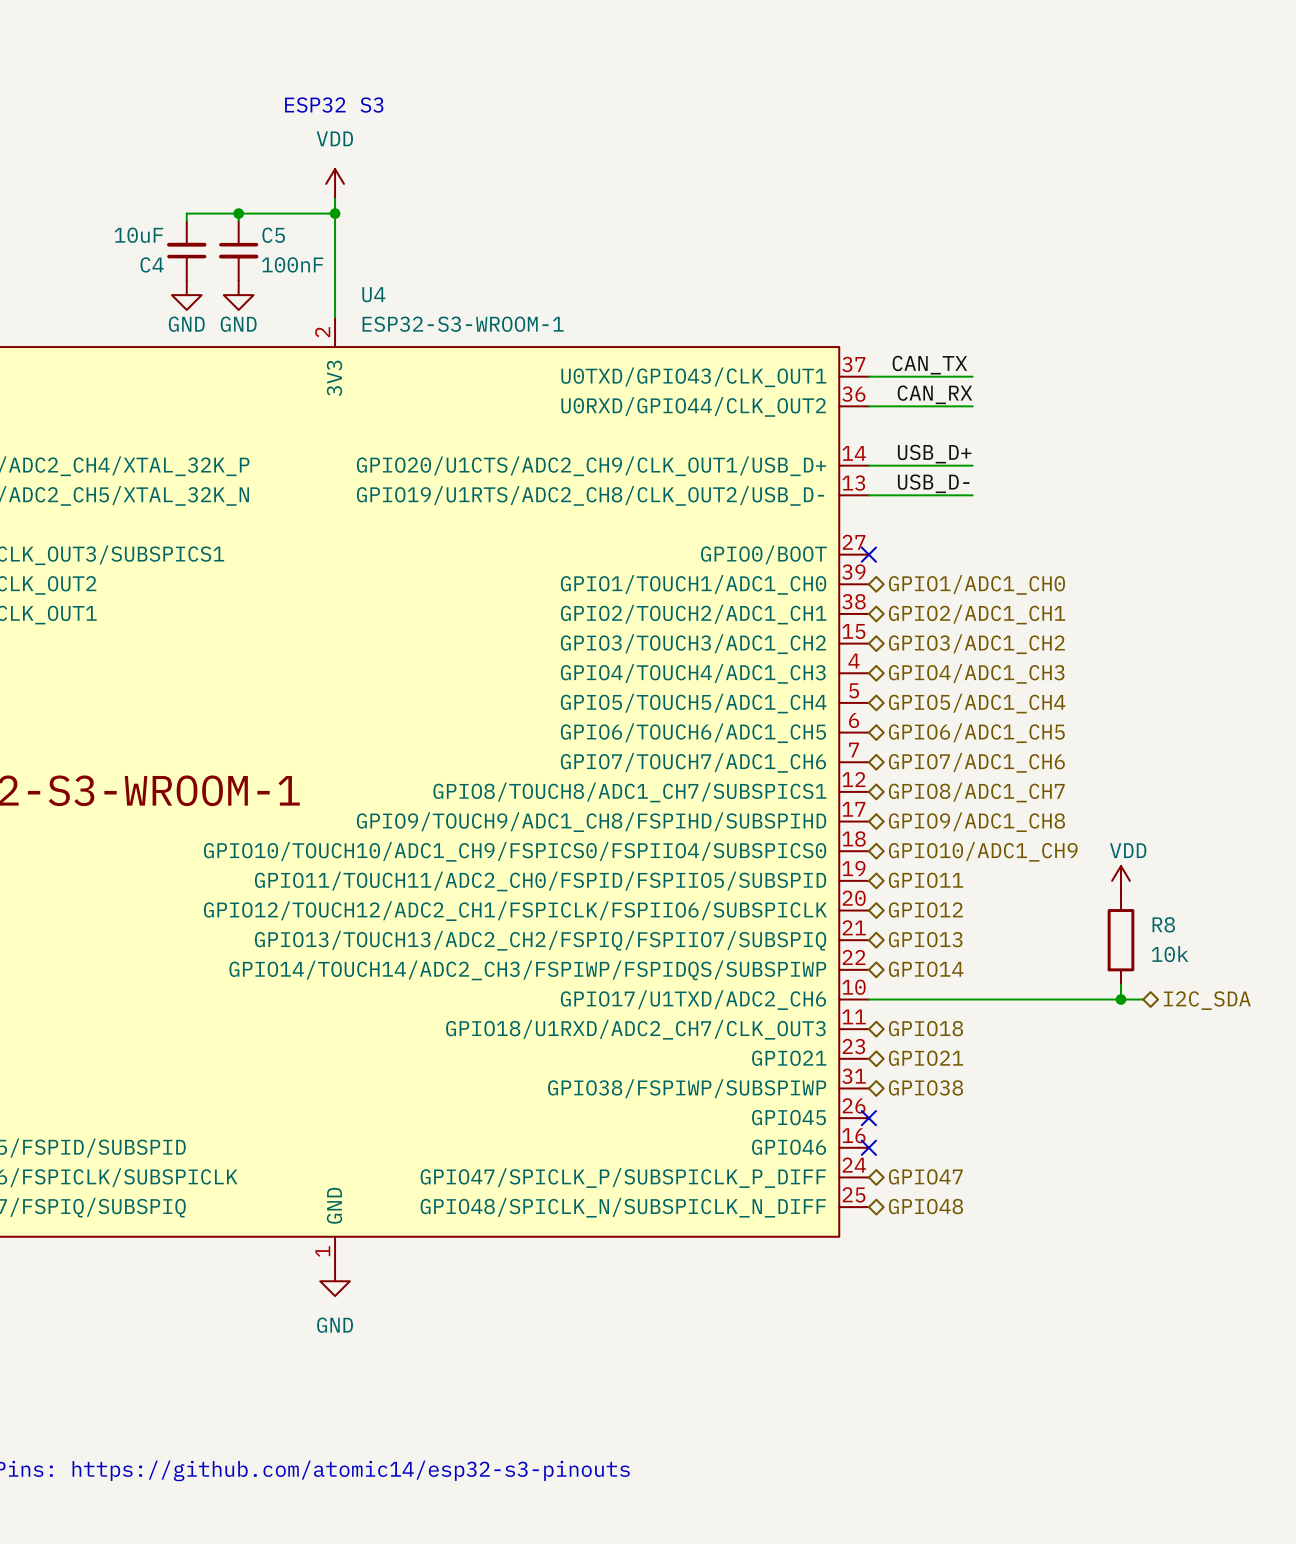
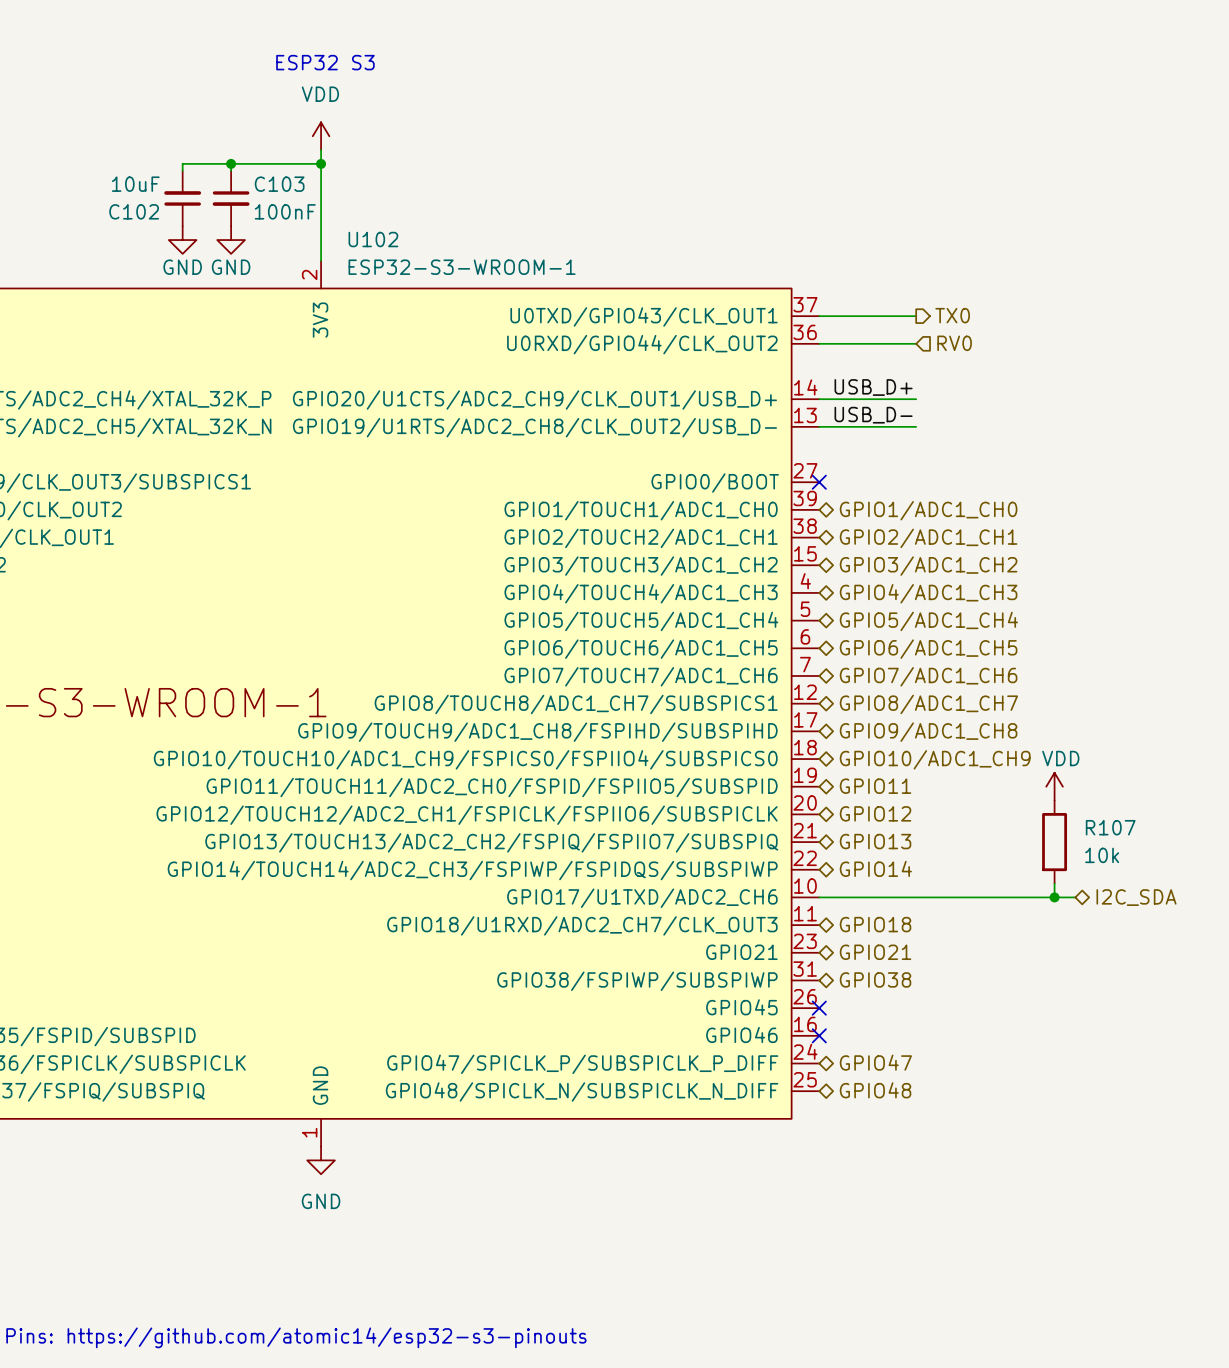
C5 name: C5 (273, 235) -> C103 (279, 184)
C4 name: C4 (152, 264) -> C102 (134, 211)
U4 name: U4 (373, 294) -> U102 (373, 239)
label: CAN_TX (929, 365) -> none
hierarchical label: none -> TX0 (952, 315)
label: CAN_RX (934, 394) -> none
hierarchical label: none -> RV0 (954, 343)
R8 name: R8 (1163, 924) -> R107 (1110, 827)

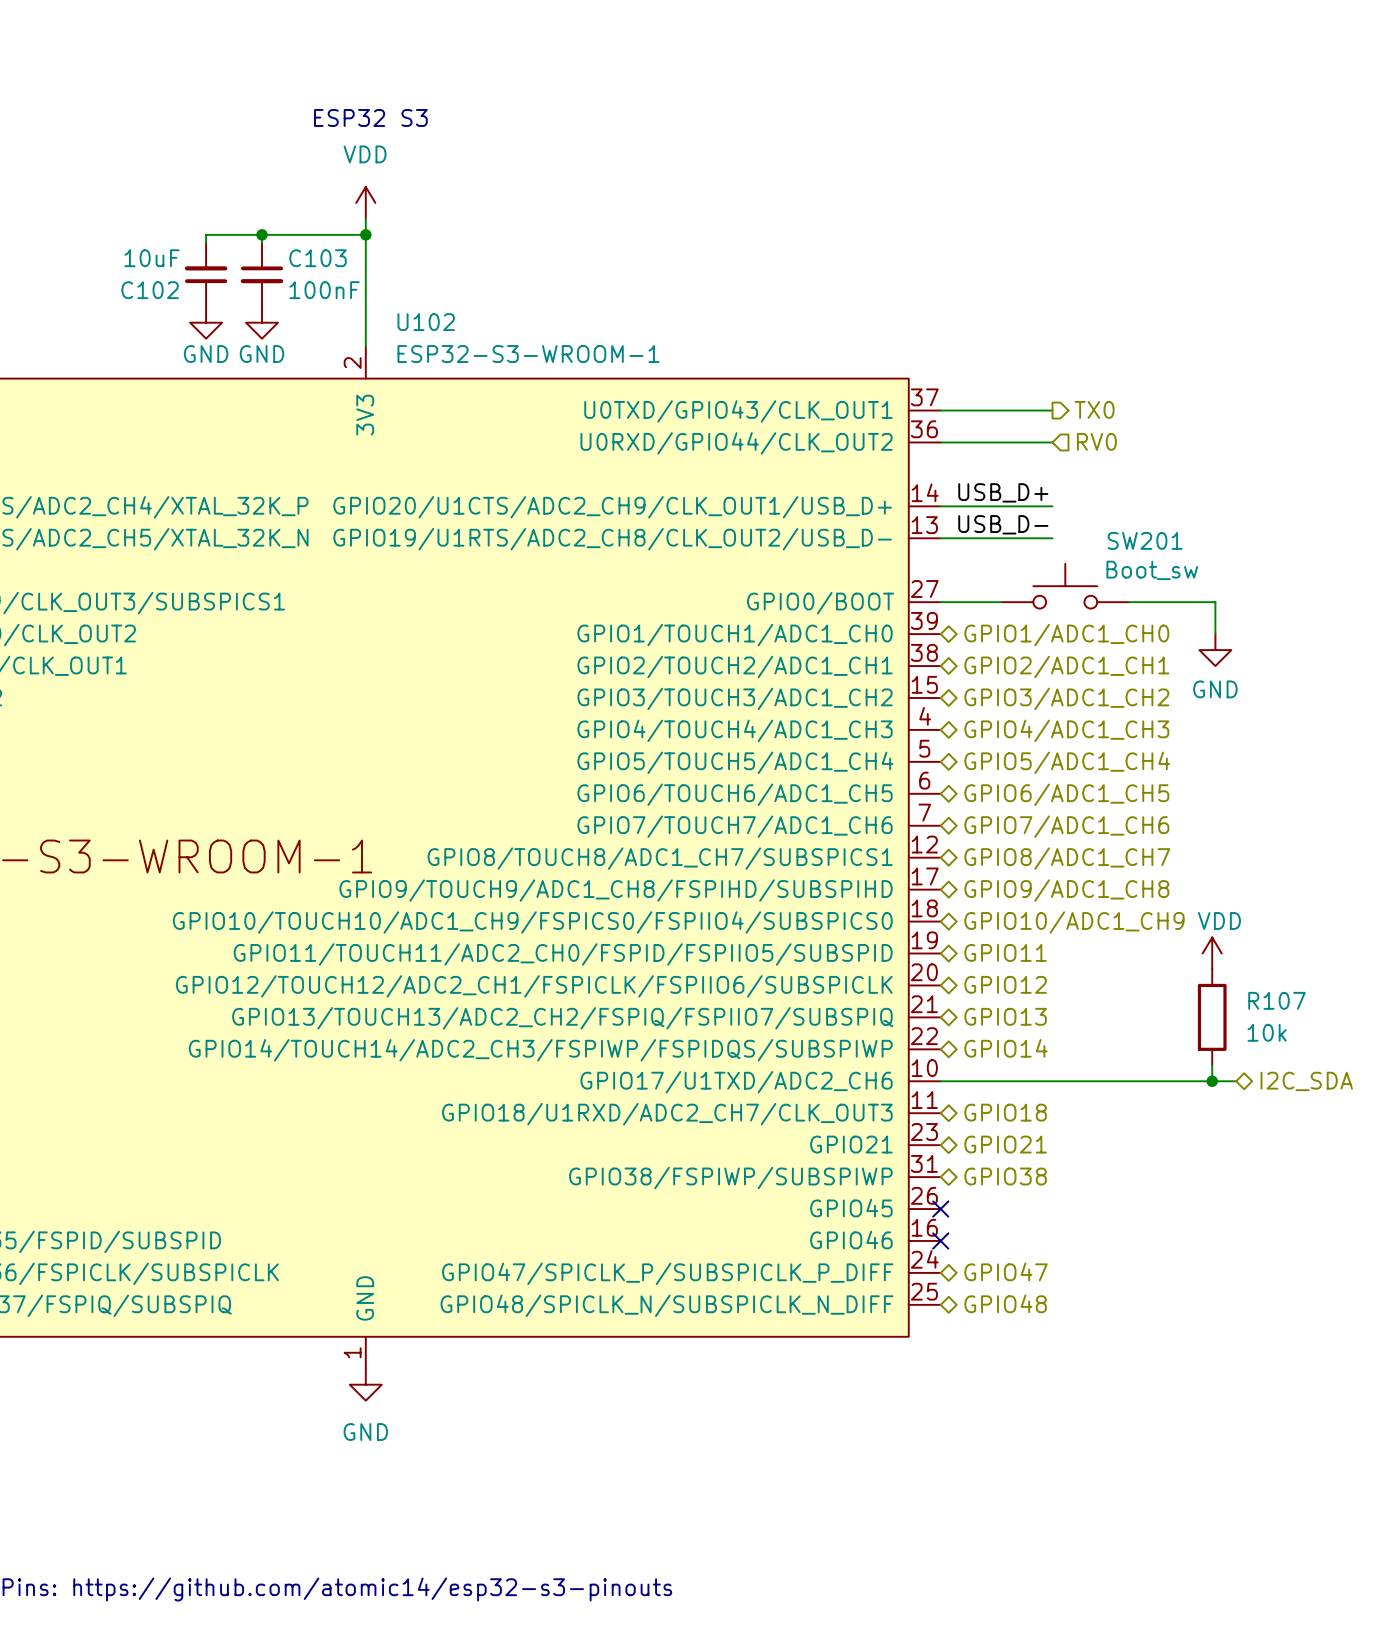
SW201: none -> Boot_sw (1065, 586)
wire: none -> (940, 602) (1001, 602)
no-connect mark: (819, 482) -> none
wire: none -> (1129, 602) (1215, 602) (1215, 634)
power symbol: none -> GND (1215, 650)

